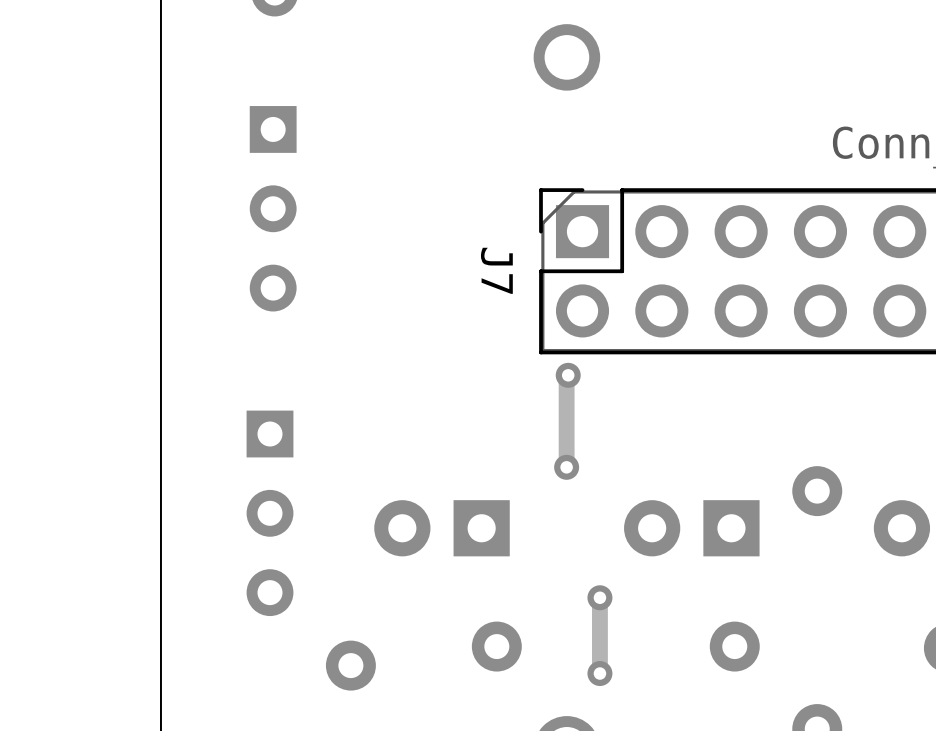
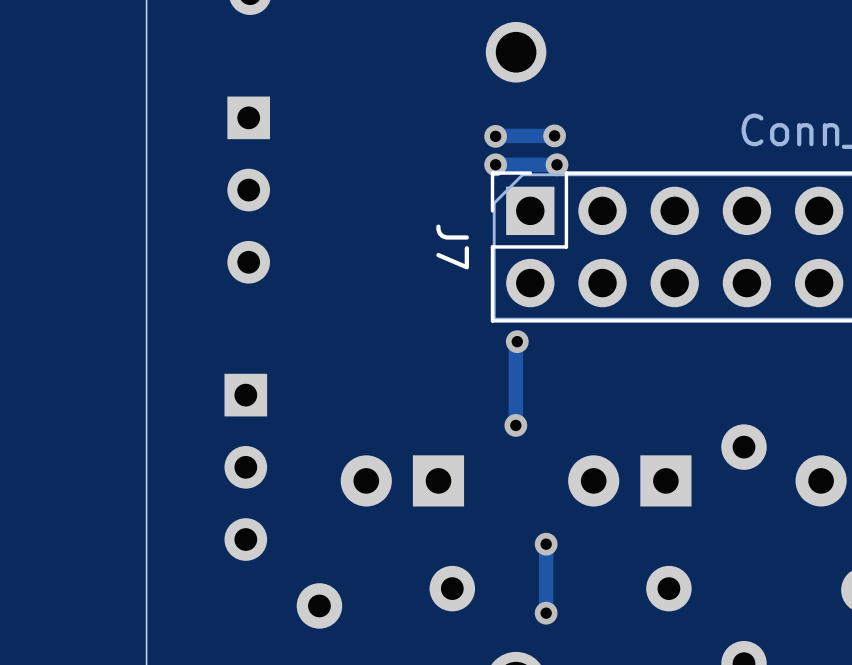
via: none -> (495, 136)
track: none -> (554, 135) (495, 136)
via: none -> (554, 135)
via: none -> (495, 164)
track: none -> (557, 164) (495, 164)
via: none -> (557, 164)

